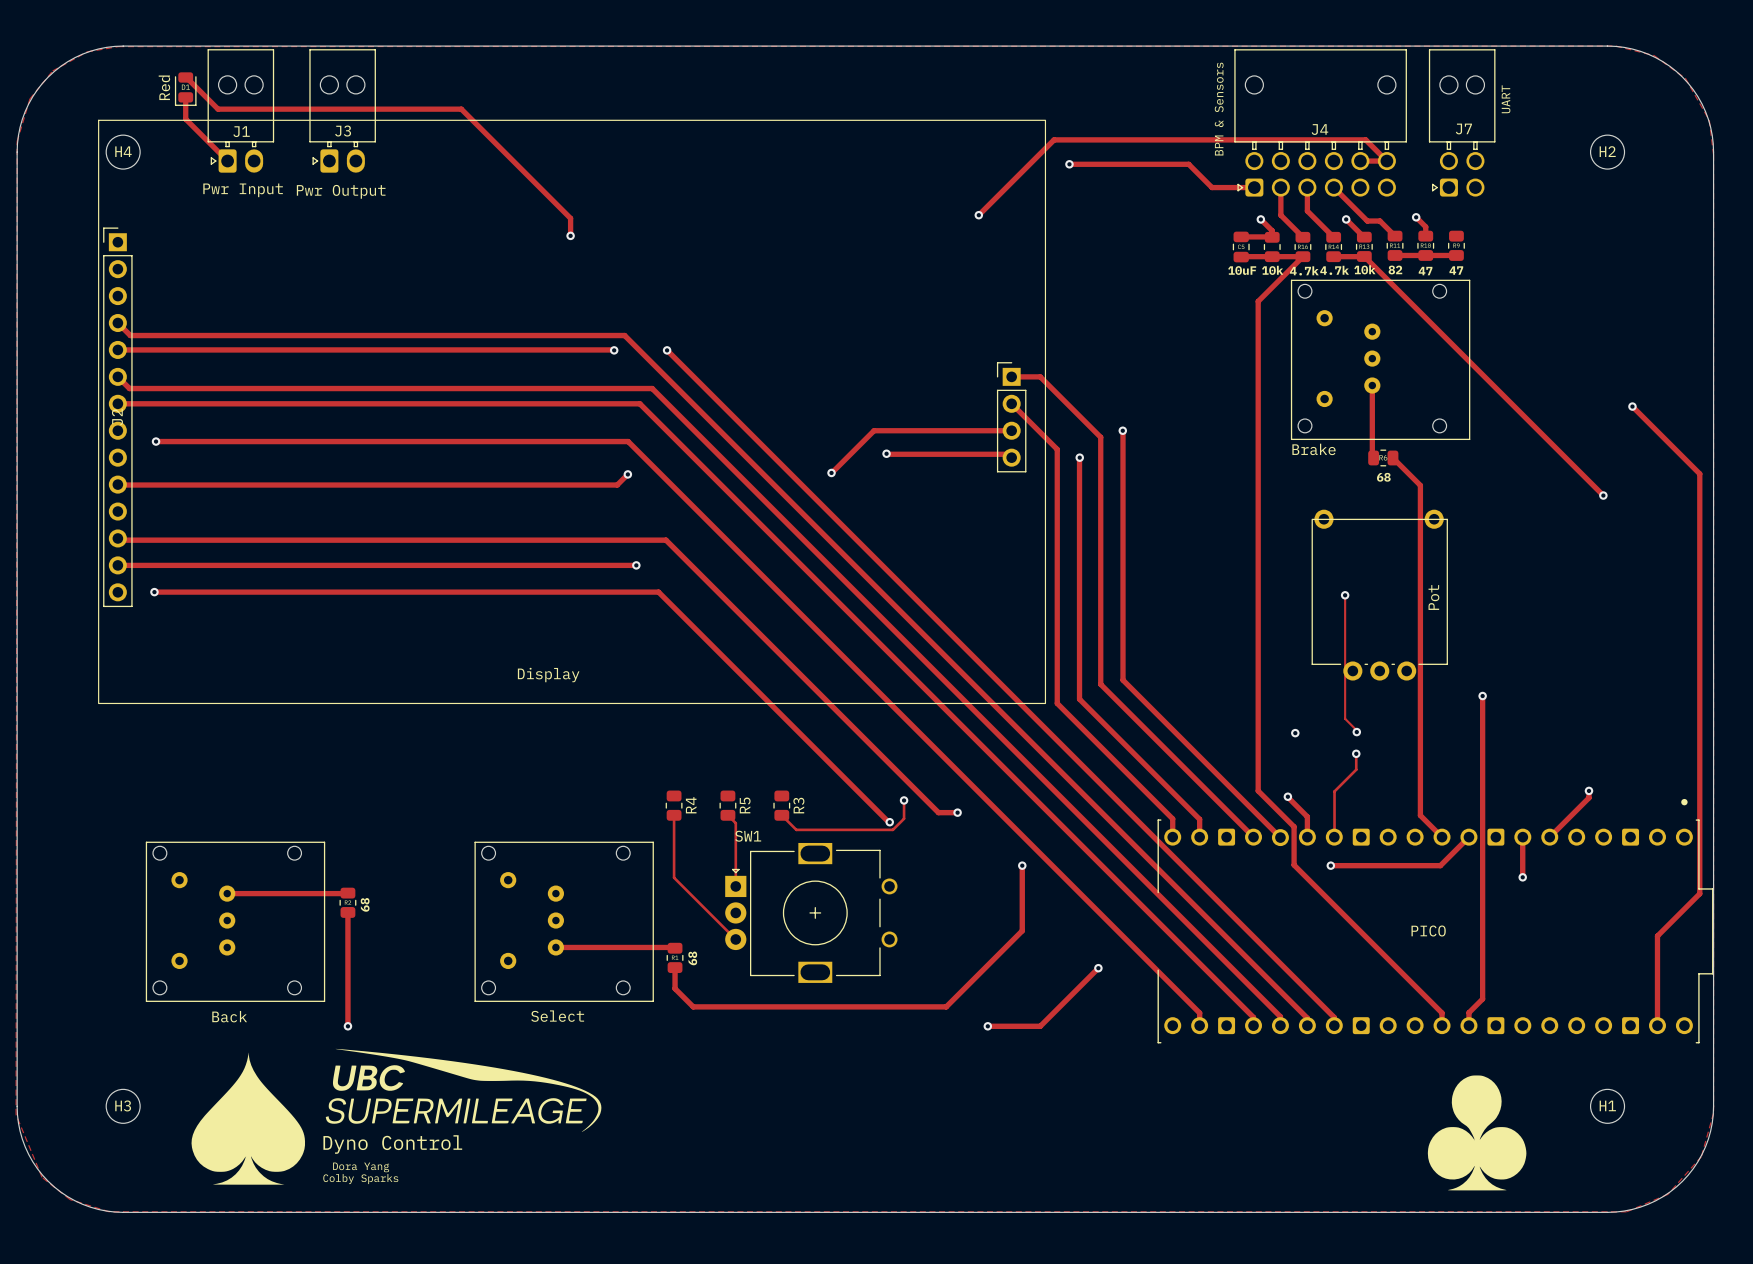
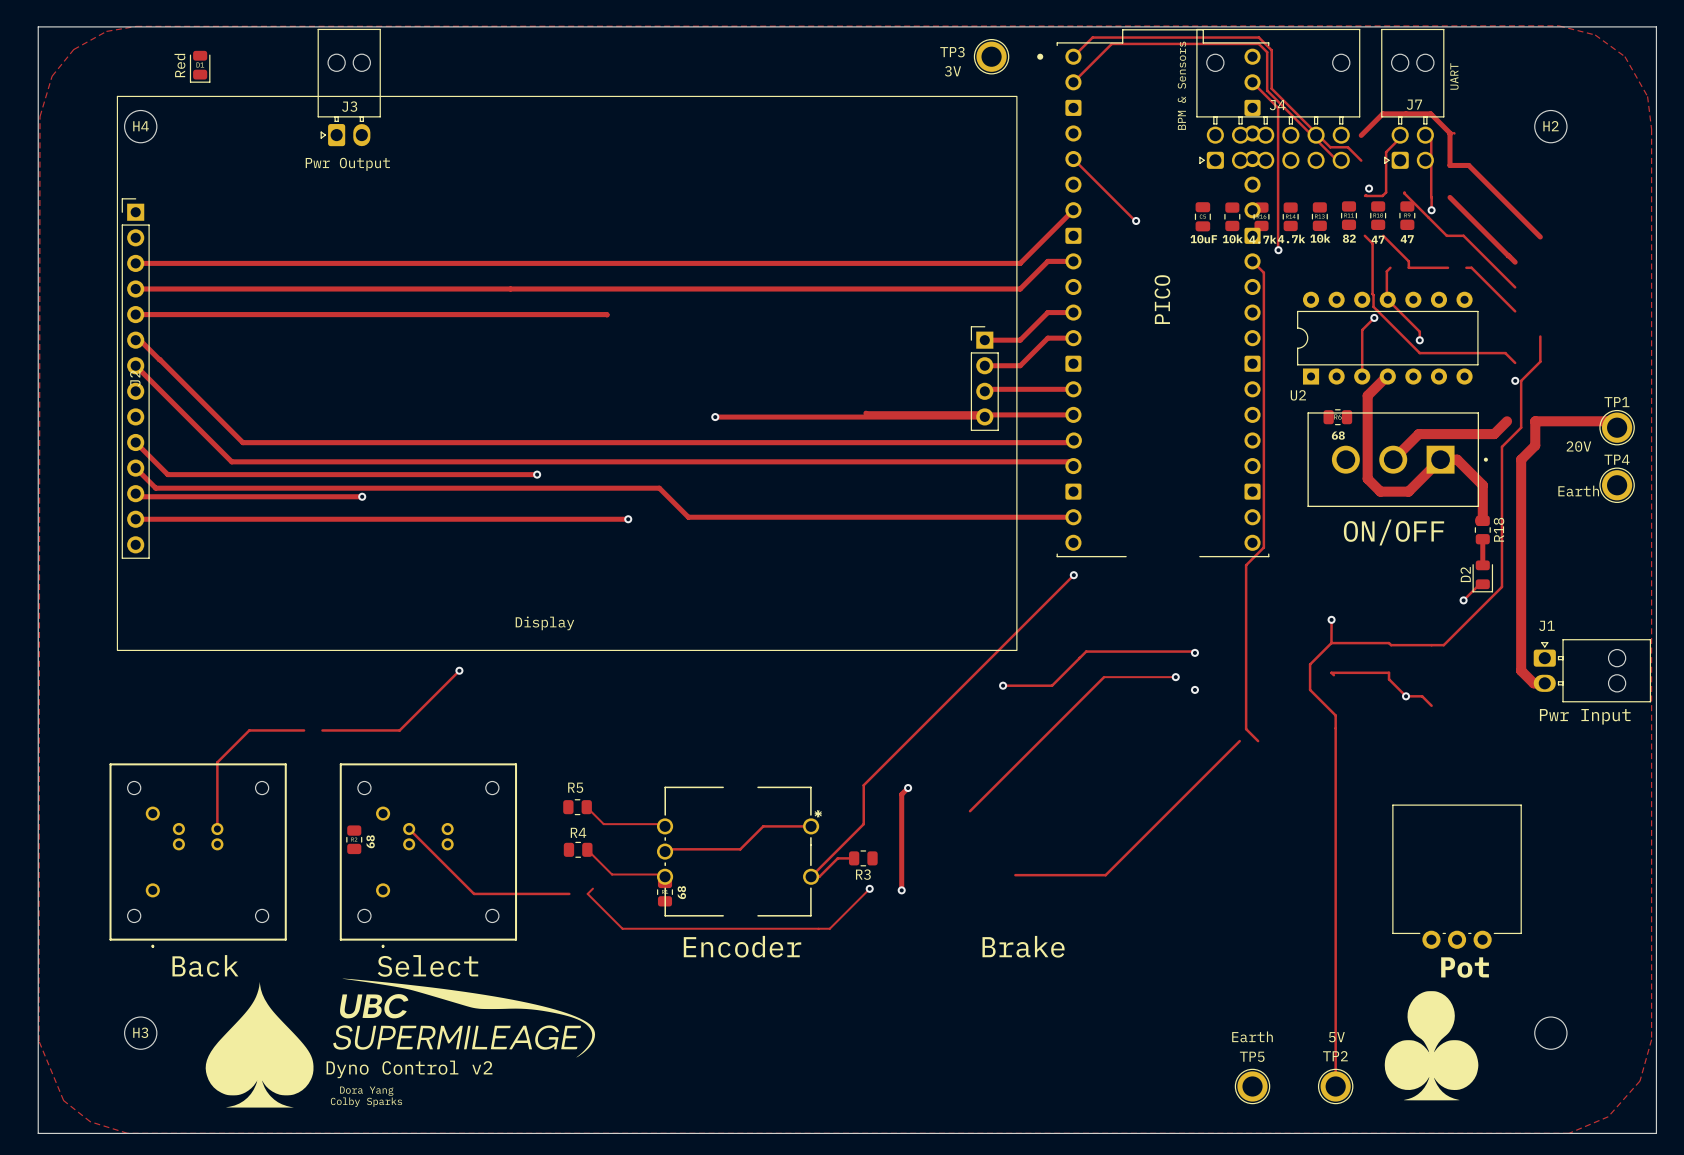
board edge: (123, 46) (1607, 46) (1640, 51) (1669, 66) (1688, 83) (1702, 103) (1710, 127) (1713, 152) (1713, 1106) (1708, 1139) (1693, 1168) (1676, 1186) (1655, 1200) (1632, 1209) (1607, 1212) (123, 1212) (90, 1207) (60, 1192) (42, 1175) (28, 1154) (22, 1139) (17, 1114) (17, 143) (20, 127) (28, 103) (42, 83) (54, 71) (67, 61) (90, 51) (123, 46) -> (38, 26) (38, 1133) (1656, 1133) (1656, 26) (38, 26)
track: (185, 77) (218, 109) (461, 109) (570, 218) (570, 235) -> none
TP3: none -> (991, 56)
track: none -> (1073, 56) (1092, 37) (1258, 37) (1271, 50) (1271, 88) (1330, 147) (1347, 147) (1361, 160)
text: none -> 3V (952, 71)
track: (185, 97) (185, 119) (227, 161) -> none
track: none -> (1073, 82) (1111, 43) (1258, 43) (1267, 52) (1267, 90) (1336, 160)
track: none -> (1252, 82) (1278, 107) (1278, 251)
J1 rotation: 0° (240, 110) -> 90° clockwise (1592, 670)
J1 position: (240, 110) -> (1592, 670)
J1 name position: J1 (241, 131) -> J1 (1546, 625)
track: none -> (1406, 132) (1386, 152) (1386, 192) (1382, 195) (1365, 195)
track: none -> (1454, 133) (1454, 133)
track: none -> (1431, 133) (1431, 210)
track: (1360, 161) (1386, 161) (1365, 139) (1054, 139) (978, 215) -> none
track: none -> (1361, 135) (1382, 113) (1430, 113) (1450, 133) (1450, 165) (1468, 165) (1540, 237)
track: (1069, 164) (1188, 164) (1212, 187) (1254, 187) -> none
via: (1069, 164) -> none
track: none -> (1073, 159) (1136, 220)
track: (1280, 187) (1280, 215) (1302, 237) -> none
track: (1307, 187) (1307, 211) (1333, 237) -> none
track: (1333, 187) (1367, 221) (1379, 221) (1395, 236) -> none
J1 value: Pwr Input (243, 190) -> none
via: (978, 215) -> none
track: (1416, 217) (1425, 226) (1425, 236) -> none
track: (1260, 219) (1272, 230) (1272, 237) (1241, 236) -> none
via: (1260, 219) -> none
track: (1346, 219) (1364, 237) -> none
via: (1346, 219) -> none
track: none -> (1404, 192) (1446, 235) (1463, 235) (1515, 287)
track: none -> (1450, 197) (1515, 262)
via: (570, 235) -> none
track: none -> (1073, 210) (1020, 263) (135, 263)
via: none -> (1431, 210)
via: none -> (1136, 220)
track: (1395, 255) (1456, 255) -> none
track: (1333, 256) (1364, 256) (1603, 495) -> none
track: (1241, 257) (1302, 256) (1258, 301) (1258, 790) (1294, 826) (1294, 865) (1442, 1013) (1442, 1025) -> none
track: none -> (1364, 235) (1372, 243) (1373, 306) (1419, 353) (1505, 353) (1515, 362)
track: none -> (1383, 235) (1408, 261) (1408, 267) (1448, 267)
via: none -> (1278, 250)
track: none -> (1252, 264) (1252, 261) (1263, 272) (1263, 547) (1246, 565) (1246, 729) (1258, 741)
track: none -> (1390, 267) (1386, 271) (1386, 299)
track: none -> (1466, 267) (1471, 267) (1515, 311)
track: (117, 323) (130, 335) (624, 335) (1307, 1018) (1307, 1025) -> (135, 288) (1020, 288) (1047, 261) (1073, 261)
part: none -> PICO (1153, 293)
track: none -> (1387, 299) (1419, 331) (1419, 340)
via: (614, 350) -> none
track: (667, 350) (1334, 1017) (1334, 1025) -> none
via: (667, 350) -> none
track: none -> (1374, 317) (1362, 330) (1362, 376)
via: none -> (1374, 317)
part: Brake (1380, 359) -> none
track: none -> (1540, 336) (1540, 361) (1521, 380) (1521, 427) (1501, 446) (1501, 586) (1443, 645) (1331, 643)
U2: none -> (1387, 338)
track: (117, 376) (129, 388) (652, 388) (1280, 1016) (1280, 1025) -> (135, 340) (139, 340) (242, 442) (1071, 442) (1073, 440)
track: (1040, 376) (1100, 437) (1100, 684) (1253, 837) -> (1011, 340) (1020, 340) (1047, 312) (1073, 312)
via: none -> (1419, 340)
track: (1372, 385) (1373, 457) -> none
track: (117, 403) (639, 403) (1253, 1017) (1253, 1025) -> (135, 365) (231, 461) (1069, 461) (1073, 466)
track: (1011, 403) (1057, 449) (1057, 703) (1172, 818) (1172, 837) -> (984, 365) (1020, 365) (1047, 338) (1073, 338)
track: (1632, 406) (1699, 473) (1699, 893) (1657, 936) (1657, 1025) -> none
via: (1632, 406) -> none
track: none -> (1386, 376) (1367, 395) (1367, 478) (1380, 491) (1408, 491) (1440, 459) (1457, 459) (1482, 485) (1482, 520) (1479, 520)
via: none -> (1515, 380)
track: (1011, 430) (874, 430) (832, 472) -> (984, 391) (986, 389) (1073, 389)
track: (1122, 430) (1123, 680) (1280, 837) -> none
via: (1122, 430) -> none
track: (156, 441) (628, 441) (1199, 1013) (1199, 1025) -> none
via: (156, 441) -> none
via: (886, 453) -> none
track: none -> (1073, 414) (986, 414) (984, 417) (715, 417)
via: none -> (715, 417)
track: (1079, 457) (1079, 699) (1199, 819) (1199, 837) -> none
via: (1079, 457) -> none
track: (1392, 457) (1420, 485) (1420, 815) (1442, 837) -> none
track: none -> (1507, 421) (1494, 434) (1418, 434) (1393, 459)
track: none -> (1617, 427) (1610, 421) (1535, 421) (1535, 445) (1521, 459) (1521, 670) (1533, 683) (1544, 683)
TP1: none -> (1617, 427)
via: (831, 472) -> none
track: (627, 474) (617, 485) (118, 485) -> (537, 474) (167, 474) (136, 442)
via: (627, 474) -> none
text: none -> 20V (1578, 446)
via: (1603, 495) -> none
ON/OFF: none -> (1397, 459)
track: none -> (135, 468) (155, 488) (659, 488) (688, 517) (1073, 517)
via: none -> (537, 474)
TP4: none -> (1617, 485)
text: none -> Earth (1578, 491)
track: (119, 540) (666, 540) (938, 812) (957, 812) -> (137, 495) (362, 496)
via: none -> (362, 496)
R18: none -> (1482, 530)
track: none -> (1482, 539) (1482, 565)
track: (154, 592) (658, 592) (889, 822) -> none
via: (154, 592) -> none
track: (1345, 595) (1345, 718) (1356, 730) (1356, 732) (1356, 731) (1356, 729) -> none
via: (1345, 595) -> none
part: Pot (1379, 595) -> none
track: none -> (1073, 575) (863, 785) (863, 824) (811, 876) (819, 876) (837, 858) (854, 858)
via: none -> (1073, 575)
D2: none -> (1482, 576)
track: none -> (1482, 584) (1479, 584) (1463, 600)
via: none -> (1463, 600)
via: none -> (1331, 619)
track: none -> (1331, 621) (1331, 619) (1331, 643)
track: none -> (1331, 643) (1310, 664) (1310, 689) (1335, 715) (1335, 1086)
track: (1482, 696) (1482, 999) (1468, 1012) (1468, 1025) -> none
via: (1482, 696) -> none
track: none -> (1194, 652) (1086, 651) (1052, 685) (1003, 685)
via: none -> (1194, 652)
track: none -> (459, 670) (399, 730) (322, 730)
via: none -> (459, 670)
track: none -> (1333, 675) (1331, 672) (1389, 672) (1389, 679) (1406, 696) (1422, 696) (1431, 705)
track: none -> (1175, 677) (1104, 677) (970, 811)
via: none -> (1175, 677)
via: (1356, 732) -> none
via: (1295, 733) -> none
via: none -> (1003, 685)
via: none -> (1194, 689)
via: none -> (1406, 696)
track: (1356, 753) (1356, 769) (1334, 791) (1334, 837) -> none
via: (1356, 753) -> none
text: none -> Pwr Input (1585, 716)
track: none -> (304, 730) (249, 730) (217, 762) (217, 829)
track: (1588, 790) (1588, 797) (1549, 837) -> none
via: (1588, 790) -> none
via: (1287, 796) -> none
track: (1287, 797) (1307, 816) (1307, 837) -> none
track: none -> (1239, 741) (1105, 875) (1015, 875)
track: (904, 800) (904, 818) (892, 829) (796, 829) (781, 815) -> none
via: (904, 800) -> none
R4 rotation: 0° (674, 805) -> 90° clockwise (578, 849)
R4 position: (674, 805) -> (578, 849)
R4 name position: R4 (691, 805) -> R4 (578, 832)
R5 rotation: 0° (727, 805) -> 90° clockwise (577, 807)
R5 position: (727, 805) -> (577, 807)
R5 name position: R5 (745, 805) -> R5 (575, 787)
R3 rotation: 0° (781, 805) -> 90° clockwise (863, 858)
R3 position: (781, 805) -> (863, 858)
via: (957, 812) -> none
track: (674, 815) (674, 877) (735, 939) -> none
track: (727, 815) (735, 823) (735, 886) -> none
via: (889, 822) -> none
track: (1468, 837) (1440, 865) (1330, 865) -> none
track: (1522, 837) (1522, 877) -> none
track: none -> (908, 788) (901, 794) (901, 890)
via: none -> (908, 788)
track: (1022, 865) (1022, 930) (946, 1006) (693, 1006) (675, 988) (675, 969) -> none
via: (1022, 865) -> none
via: (1330, 865) -> none
track: none -> (586, 807) (603, 824) (667, 824)
via: (1522, 877) -> none
track: none -> (810, 827) (763, 826) (740, 849) (667, 849)
track: none -> (409, 829) (474, 893) (569, 893)
track: (347, 893) (227, 893) -> none
track: (347, 912) (347, 1026) -> none
SW1: (811, 912) -> none
track: none -> (587, 849) (612, 874) (667, 874)
Encoder: none -> (738, 851)
Back: none -> (198, 855)
Select: none -> (428, 855)
part: Back (235, 921) -> none
part: Select (564, 921) -> none
part: PICO (1435, 921) -> none
part: none -> (1457, 876)
track: (555, 947) (672, 947) (675, 950) -> none
track: none -> (592, 888) (587, 893) (622, 928) (829, 928) (869, 888)
via: none -> (869, 888)
via: none -> (901, 890)
track: (1098, 968) (1040, 1026) (987, 1026) -> none
via: (1098, 968) -> none
text: none -> Brake (1023, 946)
via: (347, 1026) -> none
via: (987, 1026) -> none
text: none -> Pot (1465, 967)
H1 name: H1 (1607, 1105) -> none
text: none -> Earth (1252, 1036)
text: none -> 5V (1336, 1037)
drawing position: (1477, 1132) -> (1431, 1045)
text: Dyno Control (392, 1144) -> Dyno Control v2 (409, 1069)
TP5: none -> (1252, 1086)
TP2: none -> (1335, 1086)

